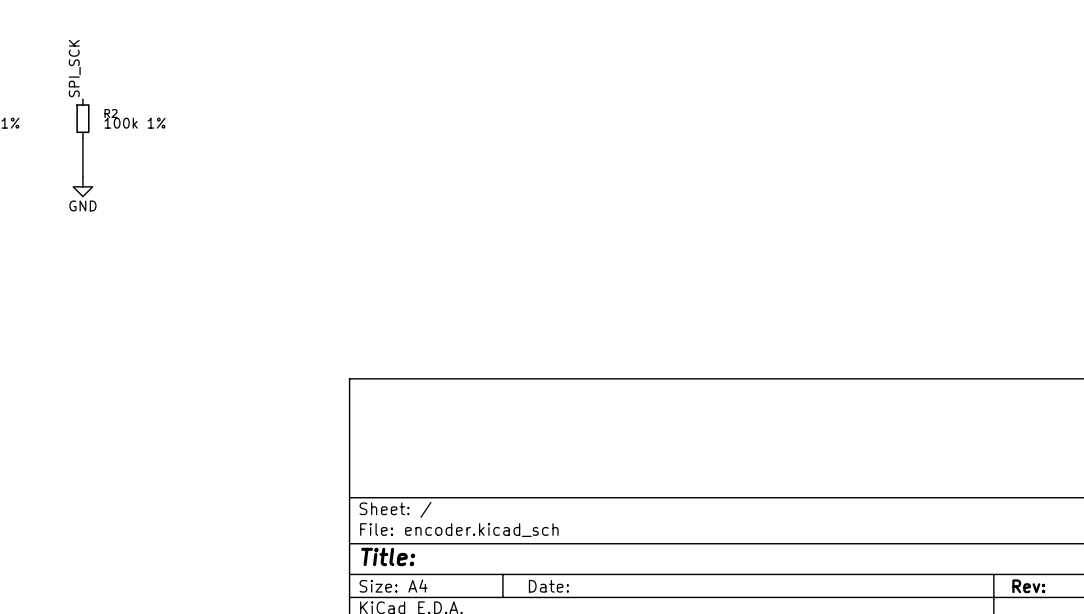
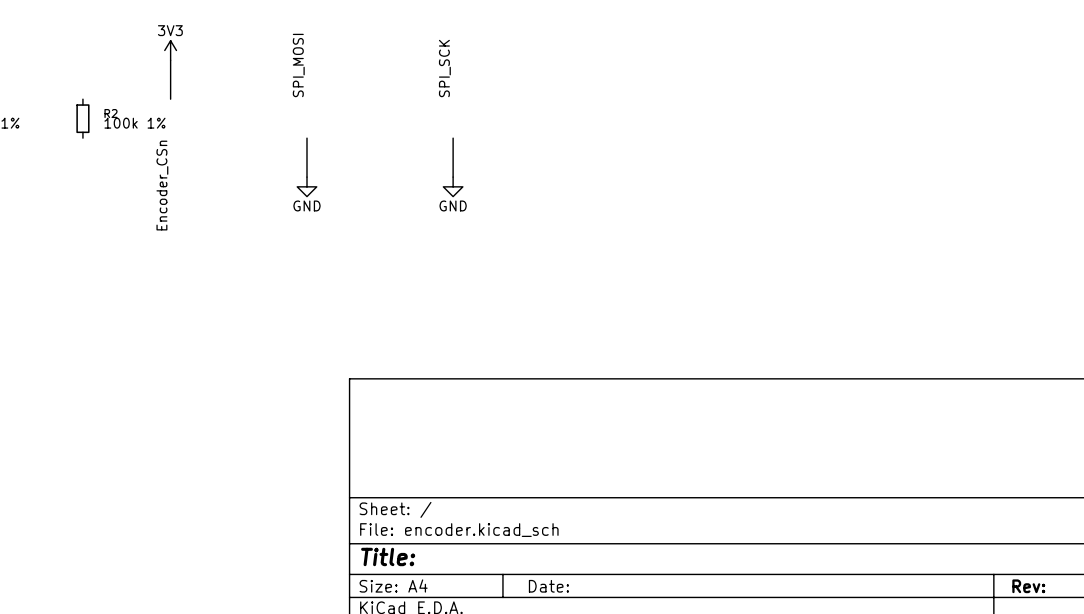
power symbol: none -> 3V3 (170, 50)
label: none -> SPI_MOSI (298, 65)
label: SPI_SCK (74, 68) -> none
label: none -> SPI_SCK (444, 68)
wire: (82, 138) (82, 177) -> (170, 60) (170, 99)
wire: none -> (306, 138) (306, 177)
wire: none -> (453, 138) (453, 177)
label: none -> Encoder_CSn (162, 185)
power symbol: GND (82, 186) -> none
power symbol: none -> GND (306, 186)
power symbol: none -> GND (453, 186)

